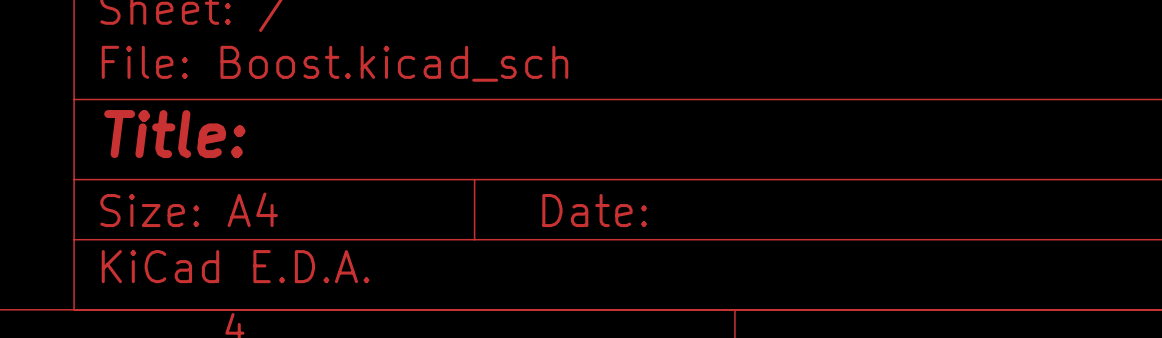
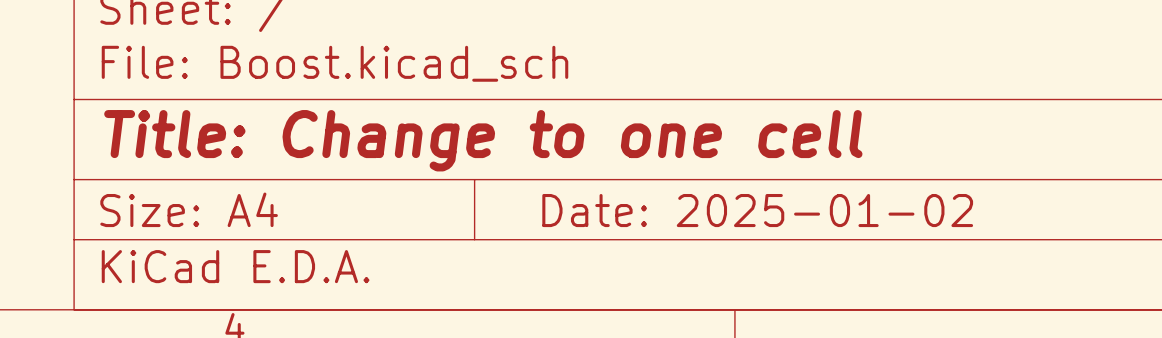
title block: Title: (174, 134) -> Title: Change to one cell (483, 140)
title block: Date: (594, 210) -> Date: 2025-01-02 (757, 210)

